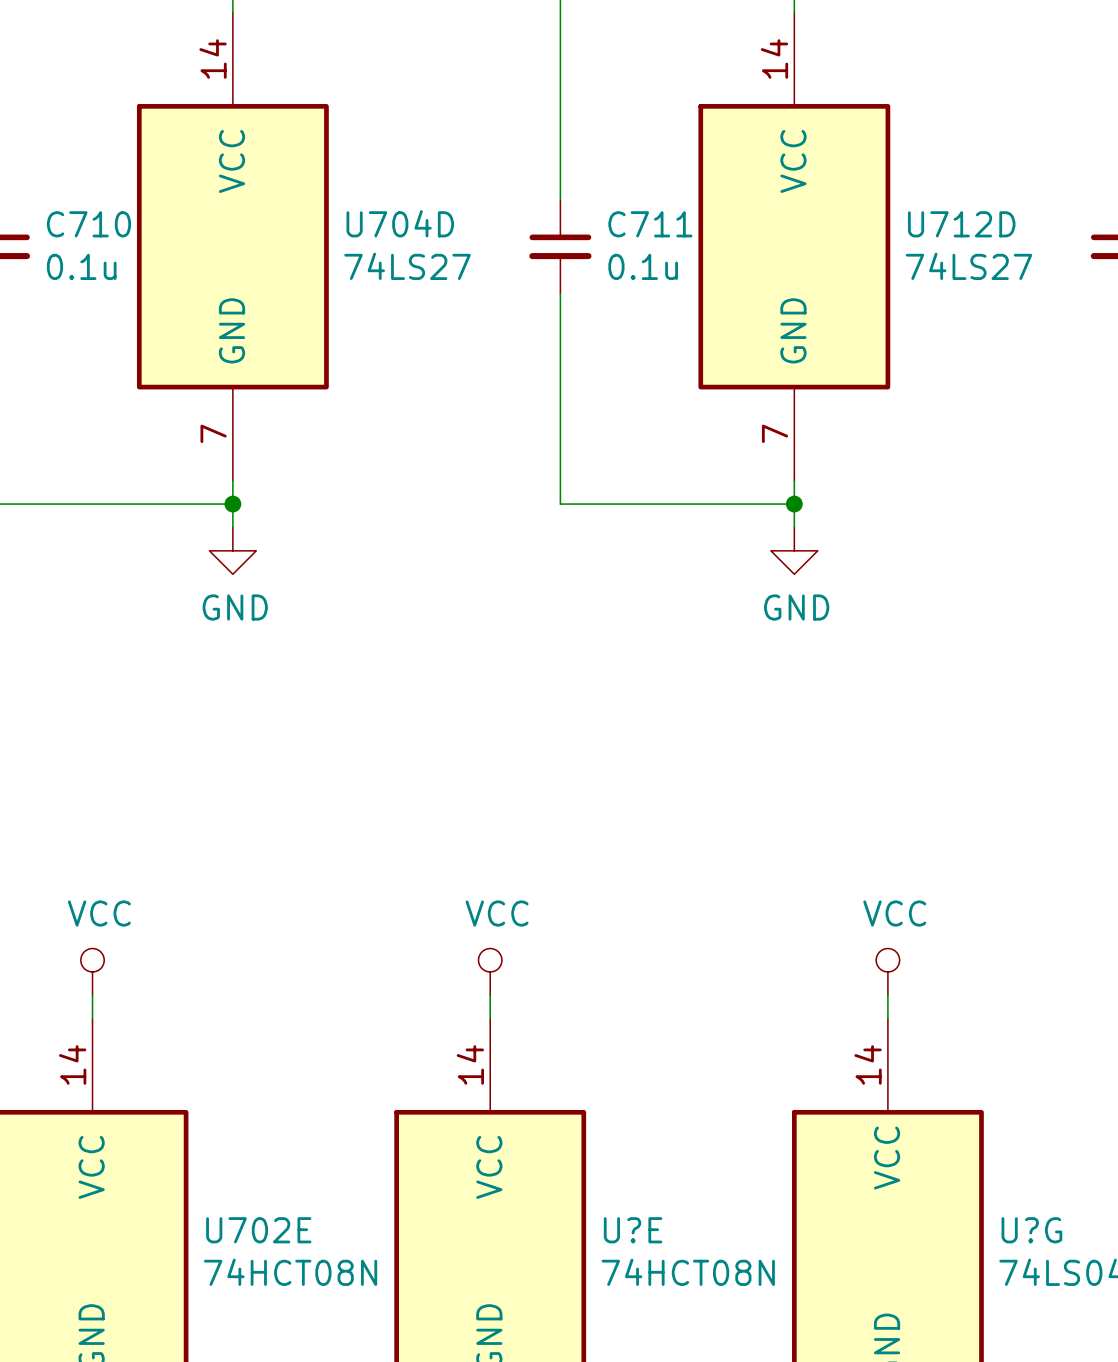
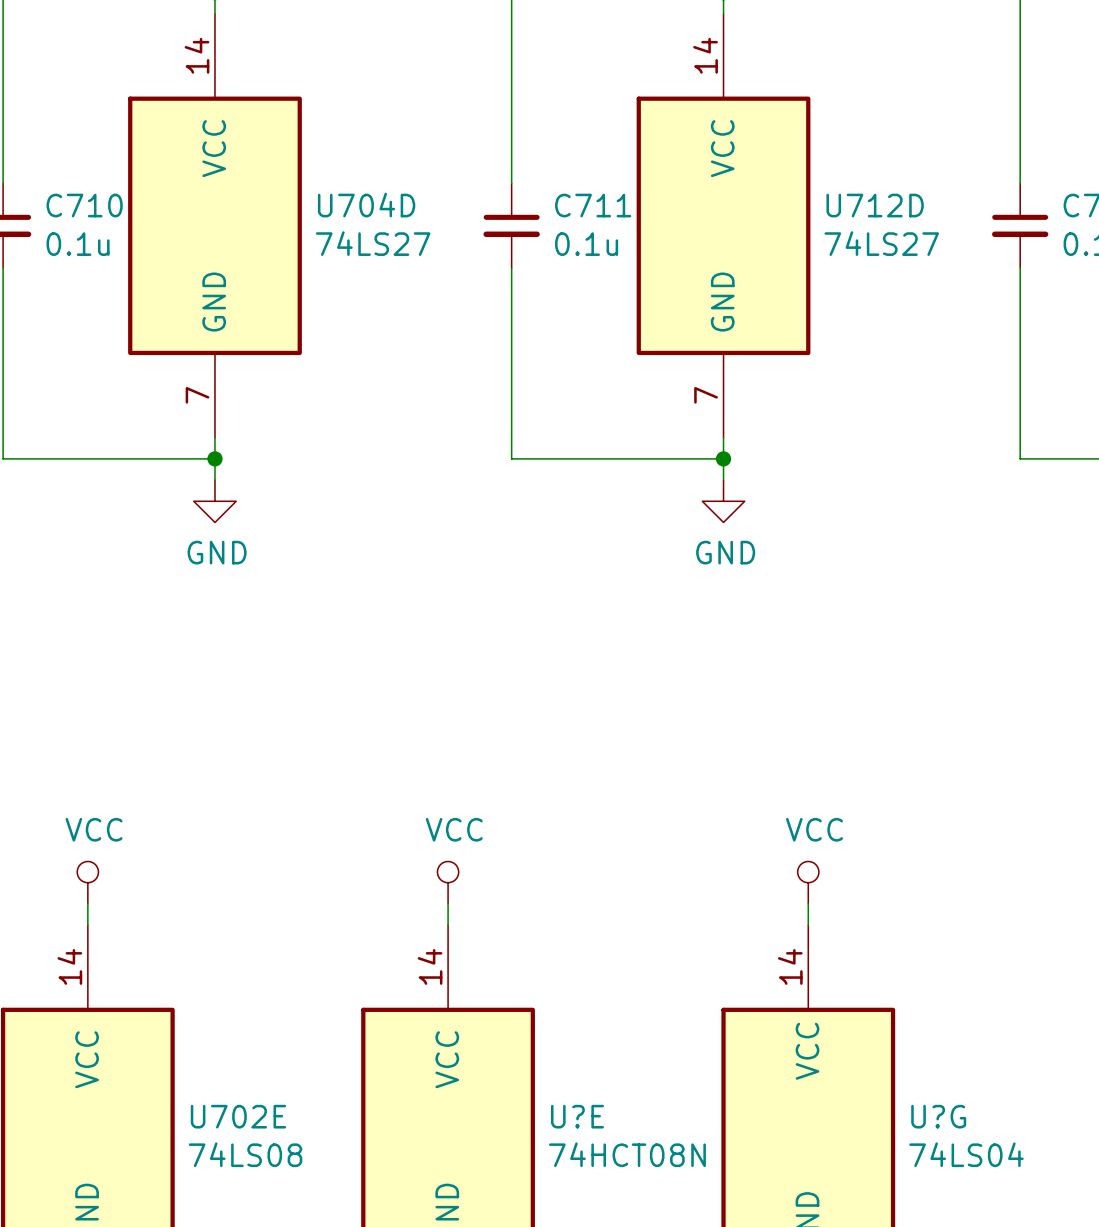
U702E value: 74HCT08N (290, 1272) -> 74LS08 (245, 1154)

